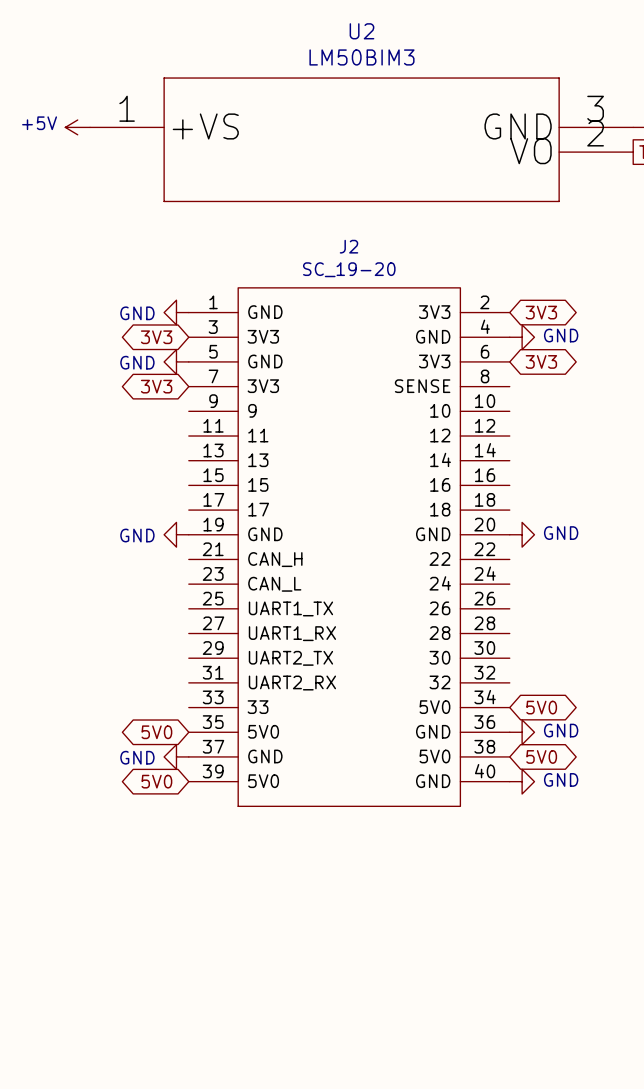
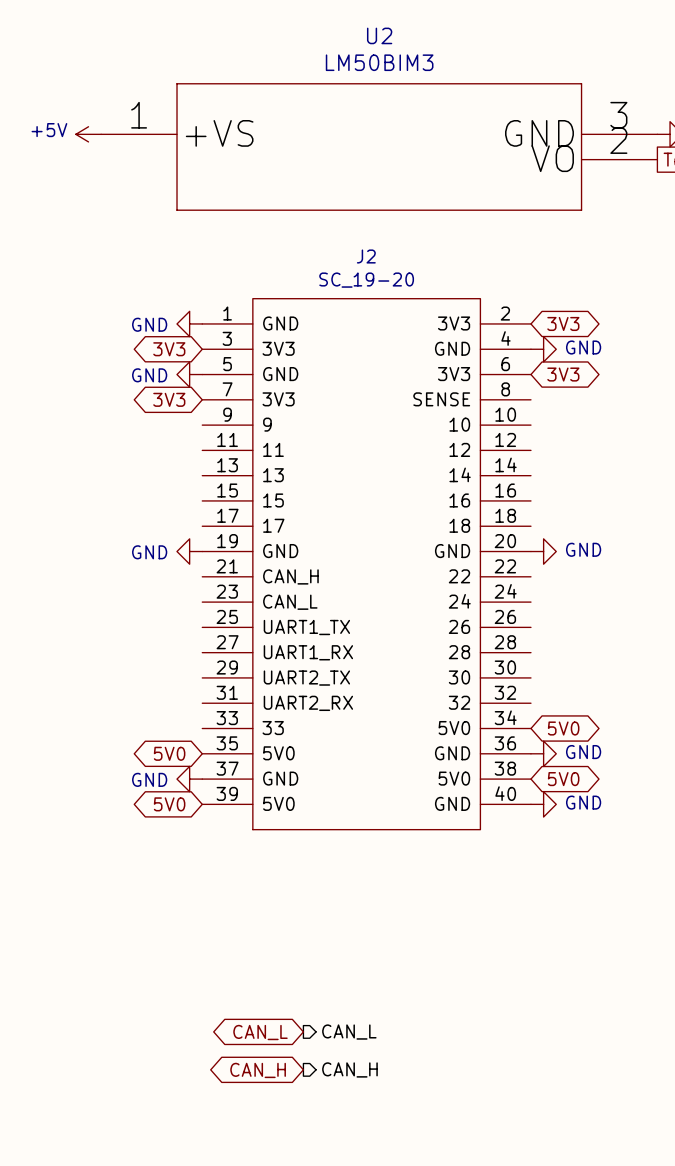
sheet pin: none -> CAN_L (349, 1032)
global label: none -> CAN_L (260, 1032)
global label: none -> CAN_H (258, 1070)
sheet pin: none -> CAN_H (349, 1069)

